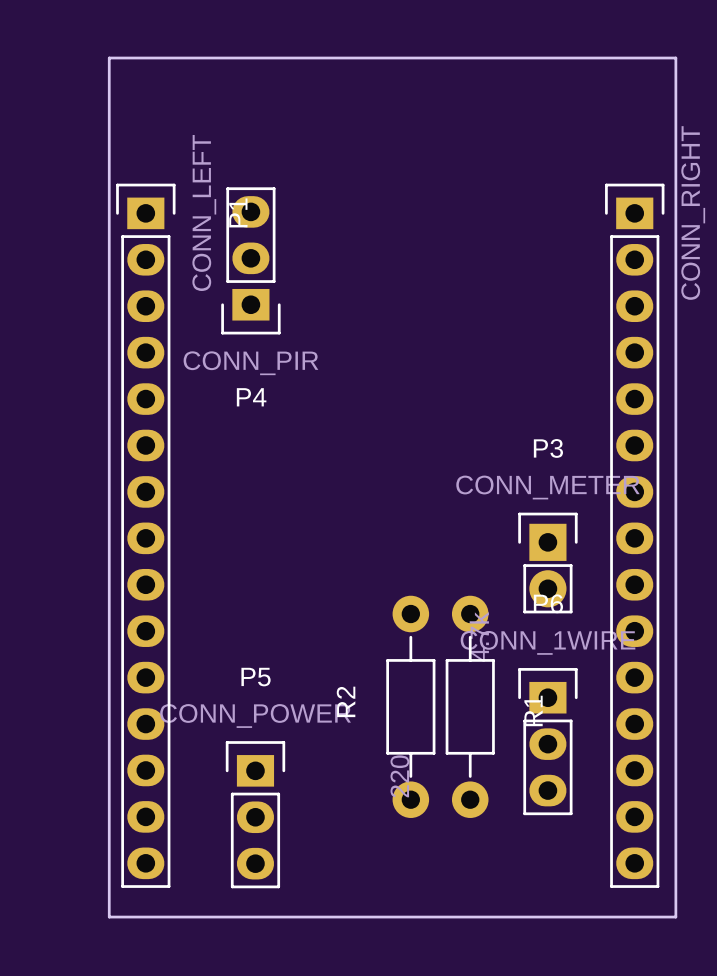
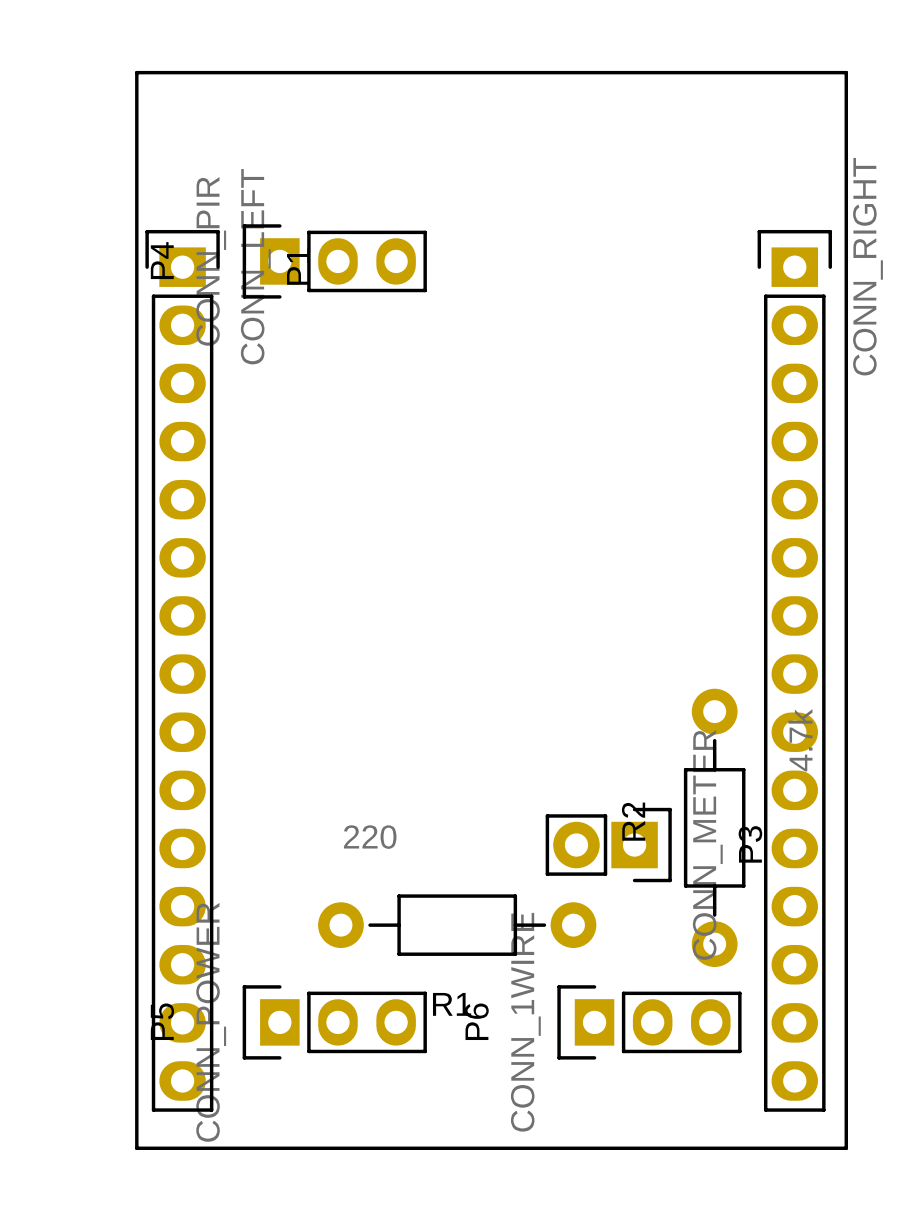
P4 rotation: 0° (250, 260) -> 90° clockwise (334, 261)
P3 rotation: 0° (547, 563) -> 90° clockwise (608, 845)
P3 position: (547, 563) -> (608, 845)
R2 position: (410, 706) -> (714, 827)
R1 rotation: 0° (470, 706) -> 90° clockwise (457, 925)
P6 rotation: 0° (547, 741) -> 90° counterclockwise (649, 1022)
P5 rotation: 0° (255, 814) -> 90° counterclockwise (334, 1022)

